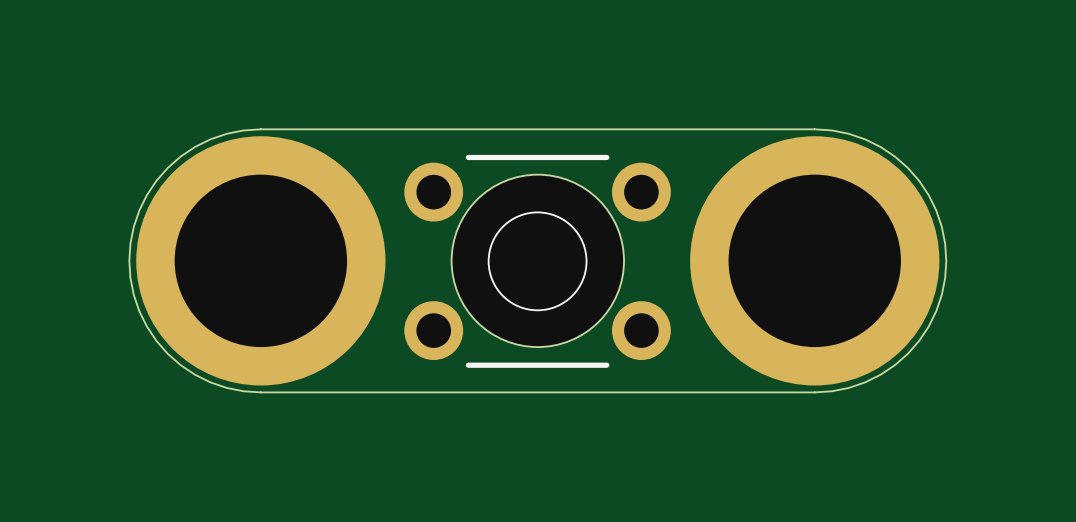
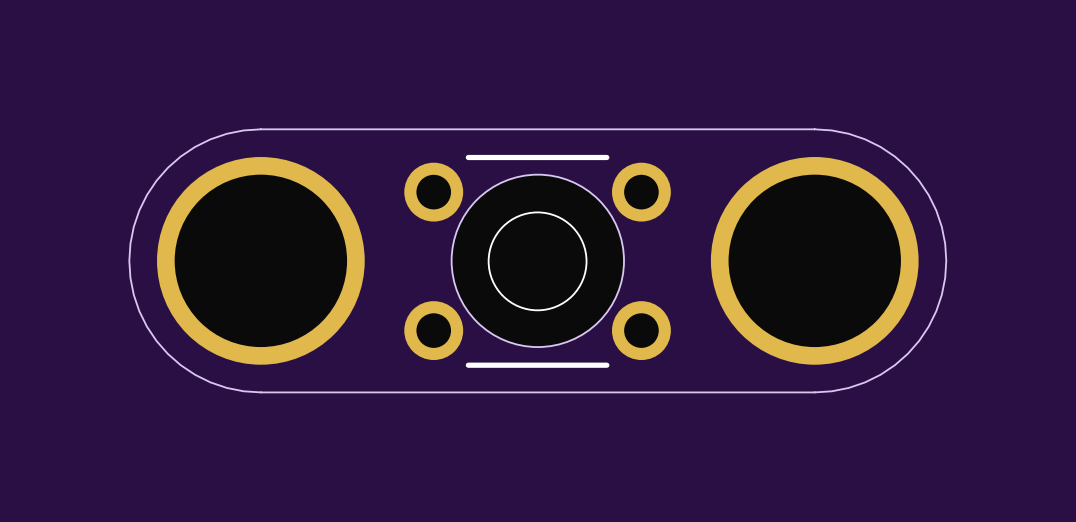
part footprint: [128, 128, 948, 394] -> [128, 128, 948, 394]

